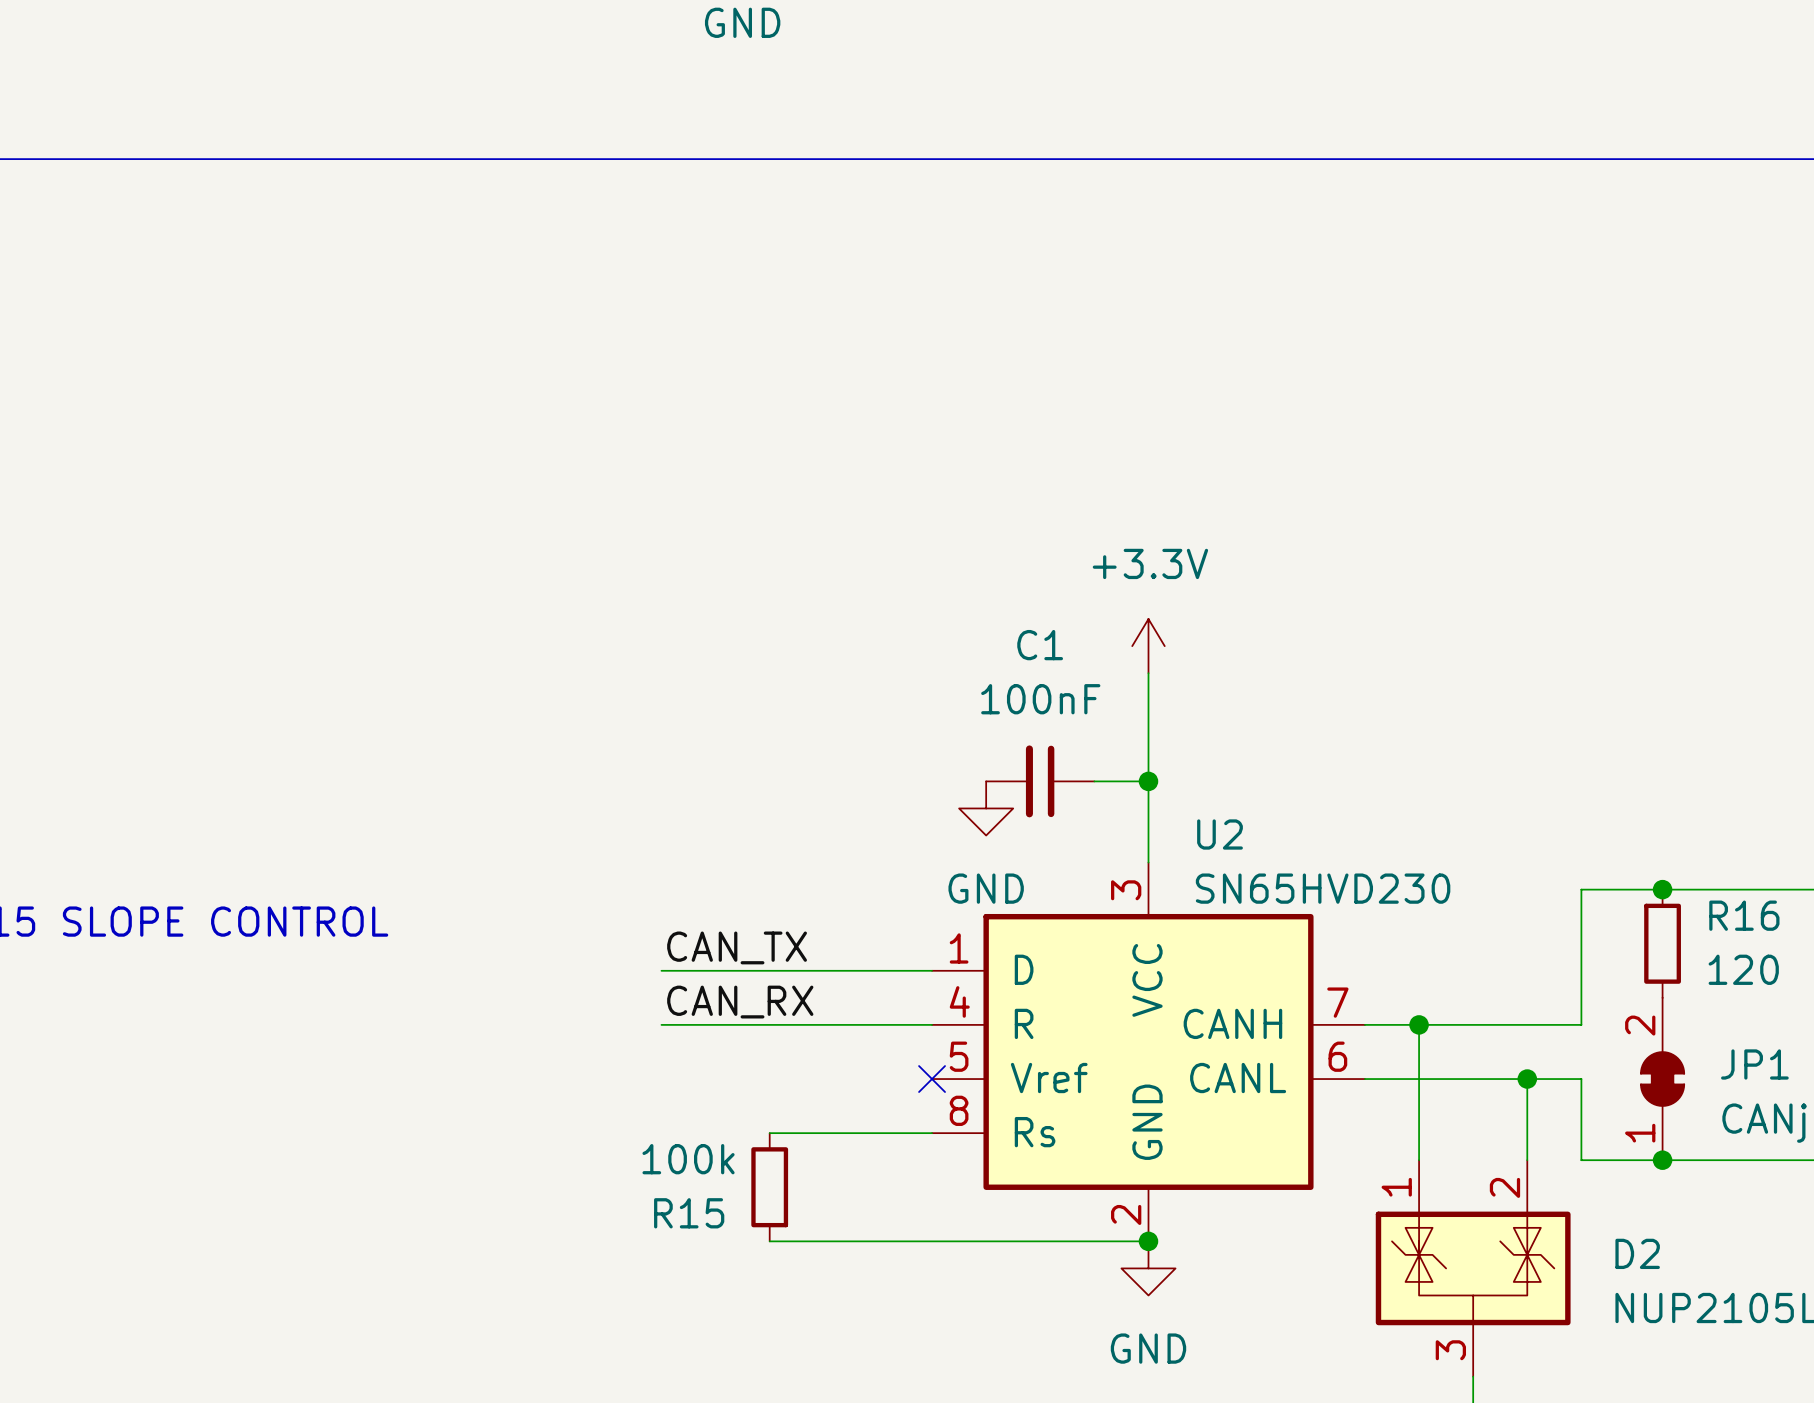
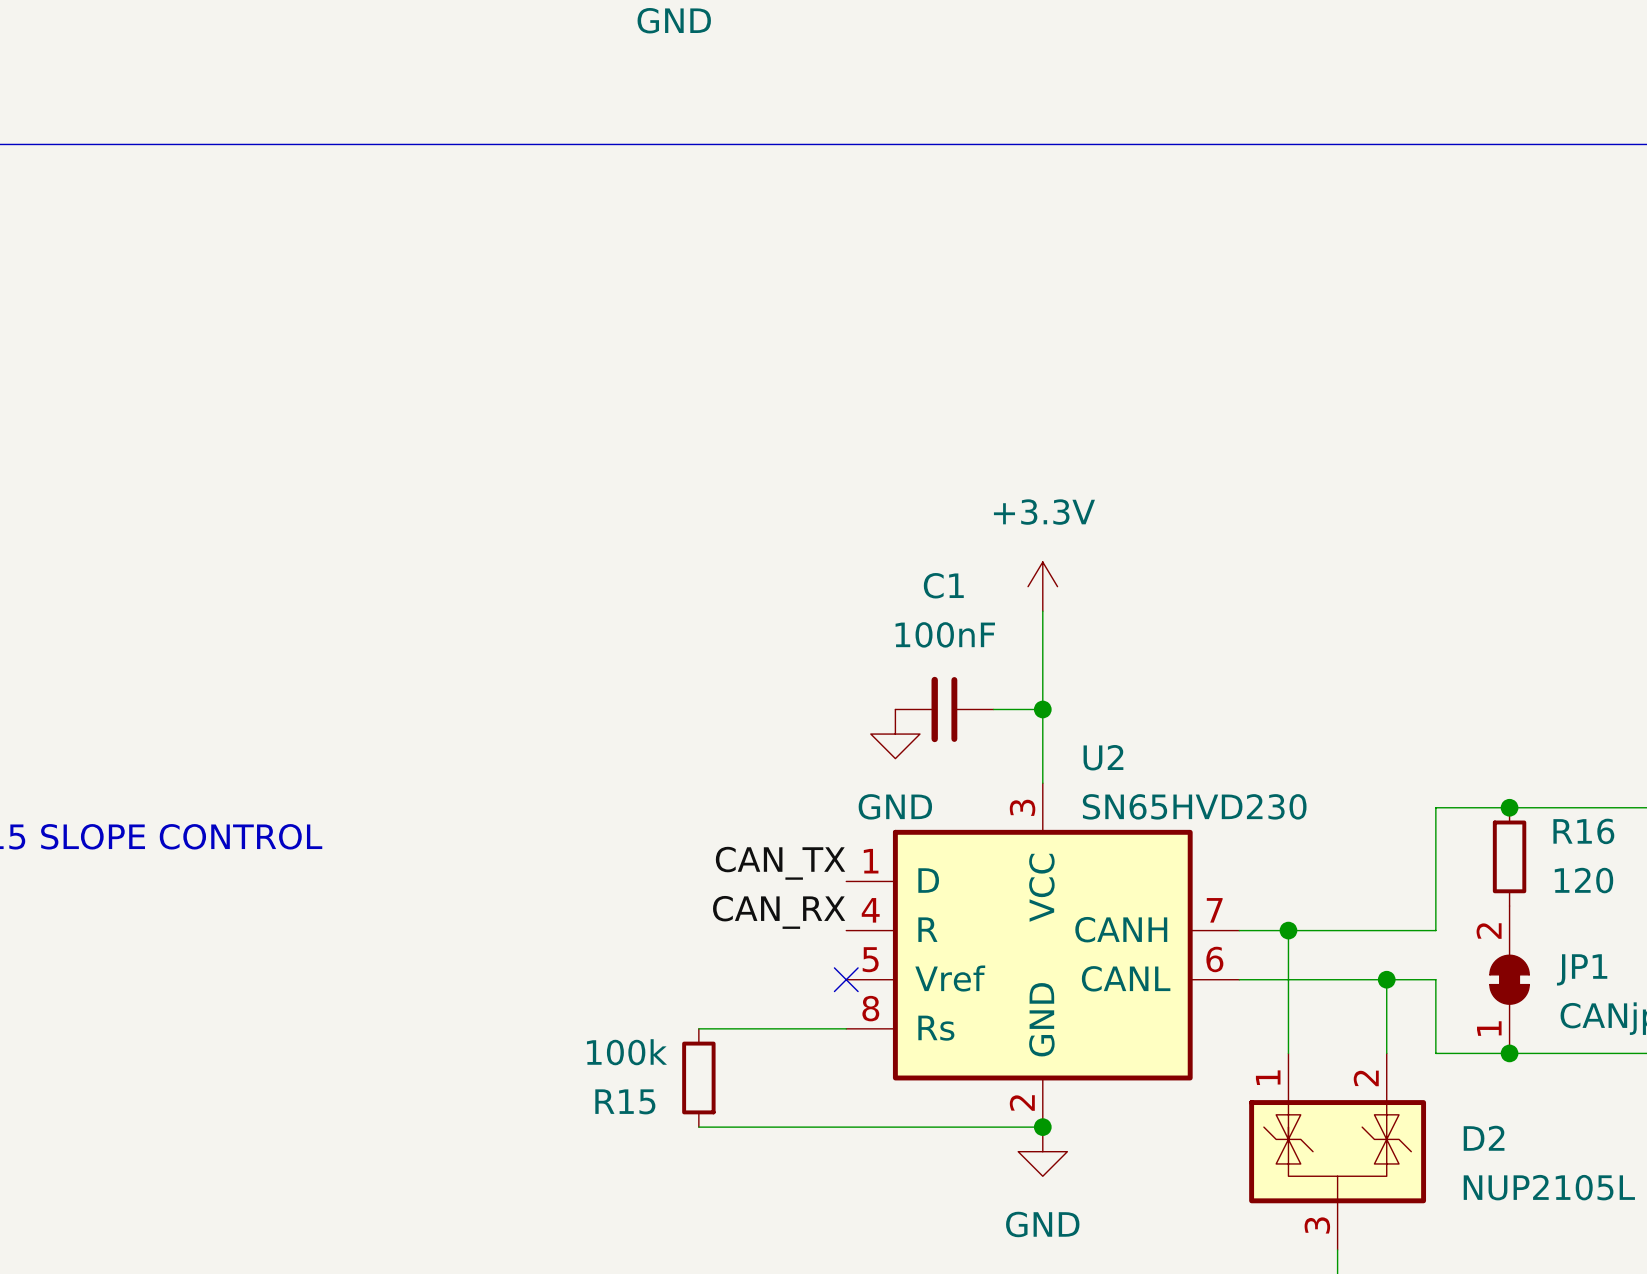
label position: CAN_TX (737, 947) -> CAN_TX (780, 863)
wire: (661, 970) (932, 970) -> none
label position: CAN_RX (740, 1002) -> CAN_RX (779, 912)
wire: (661, 1024) (932, 1024) -> none

